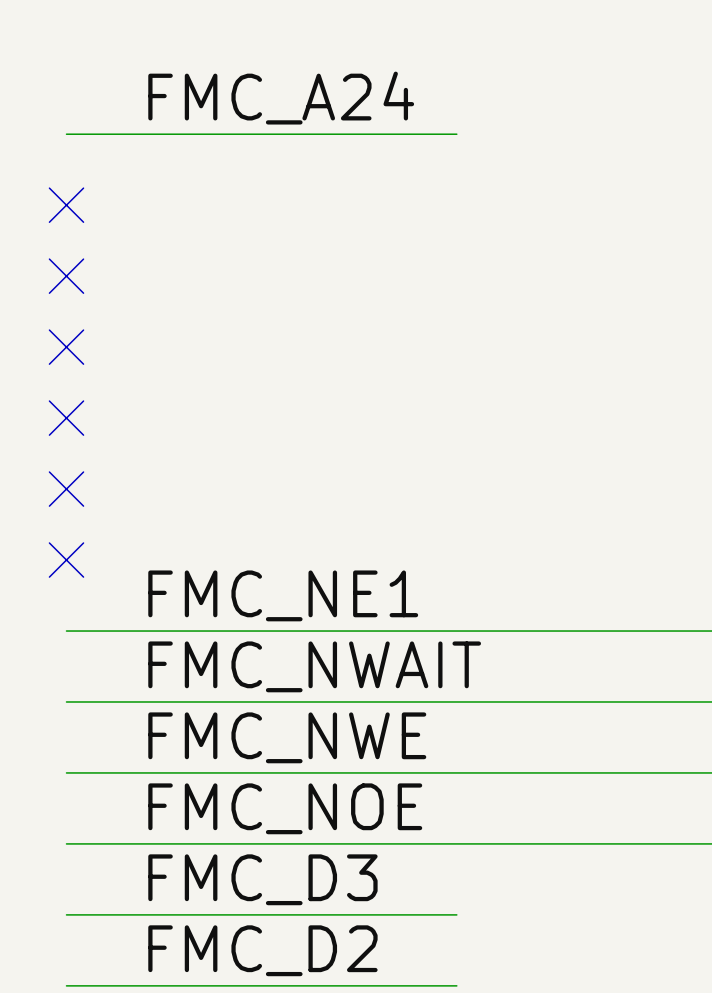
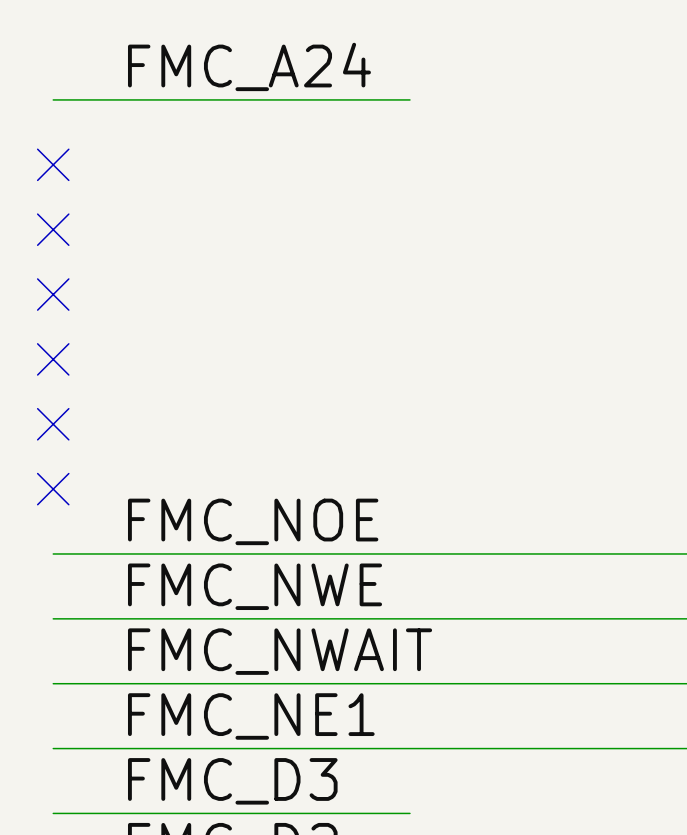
label: FMC_NE1 (283, 595) -> FMC_NOE (253, 521)
label: FMC_NWAIT (314, 666) -> FMC_NWE (255, 586)
label: FMC_NWE (287, 737) -> FMC_NWAIT (280, 651)
label: FMC_NOE (285, 808) -> FMC_NE1 (251, 716)

